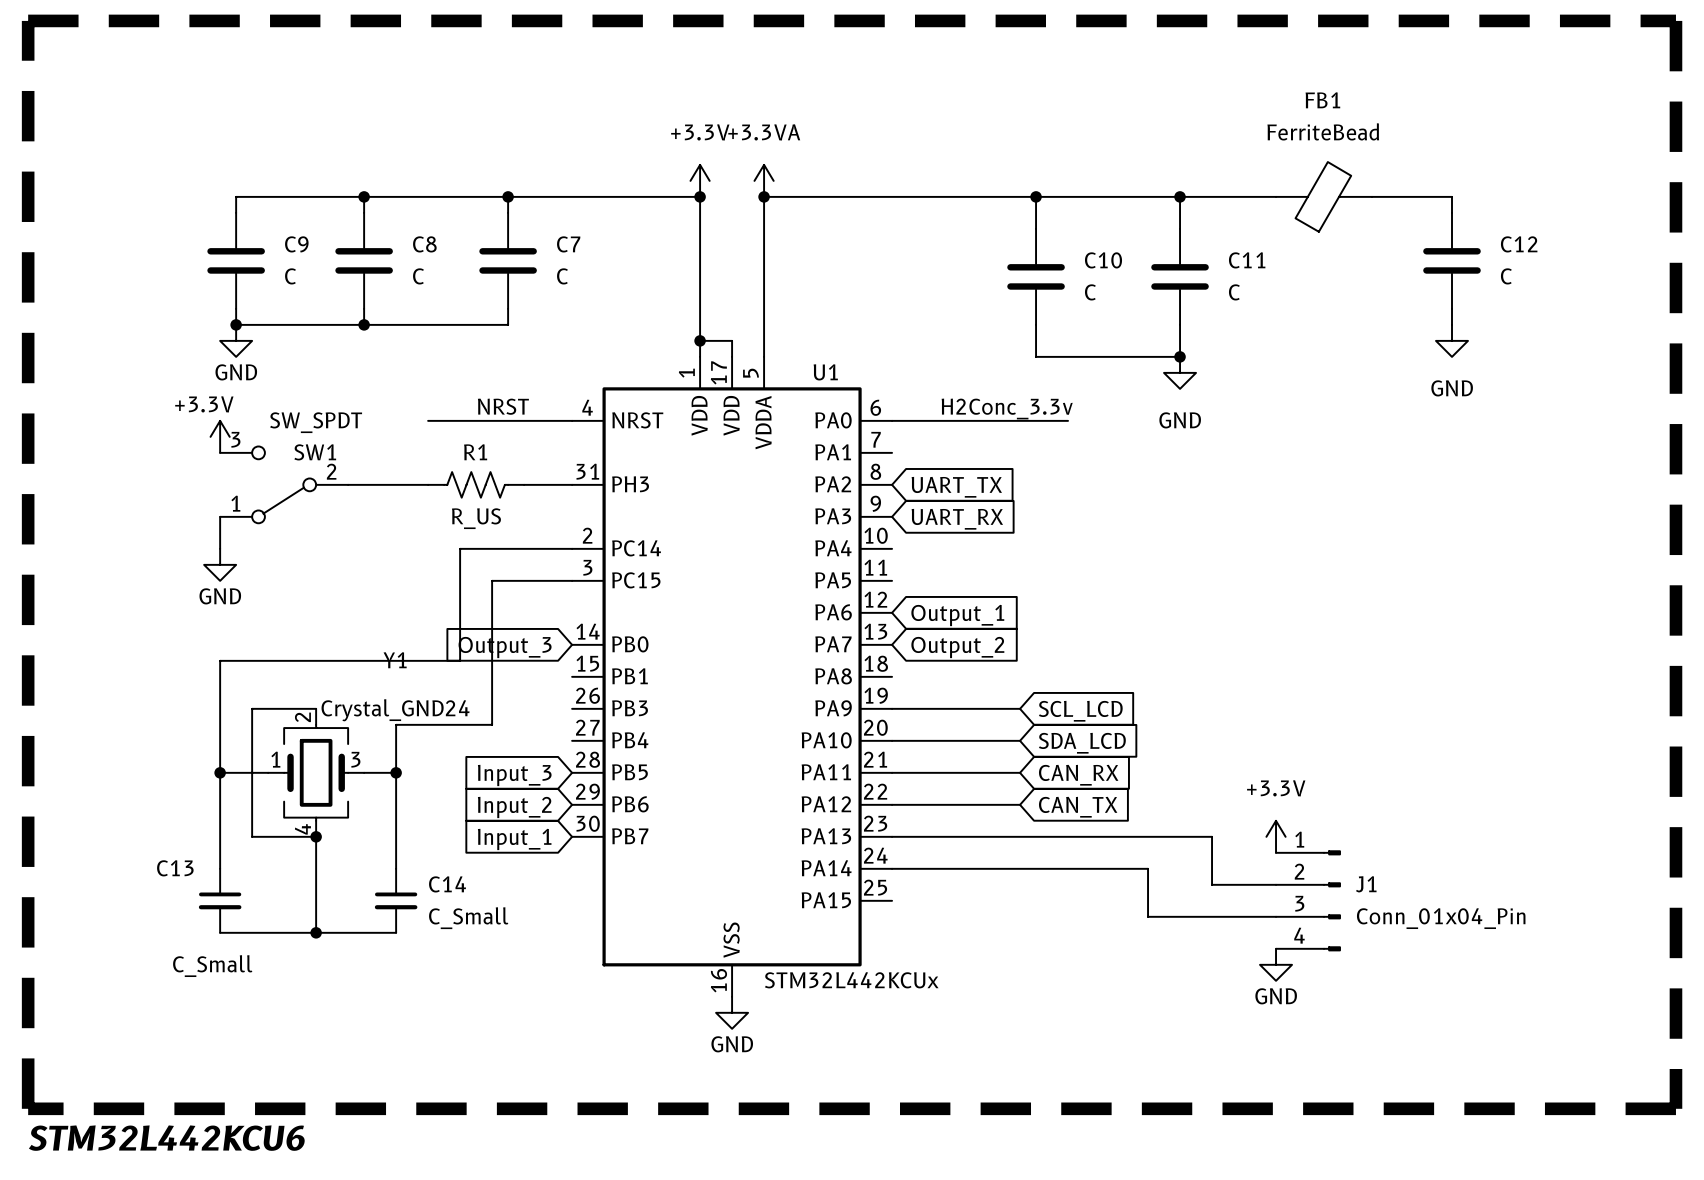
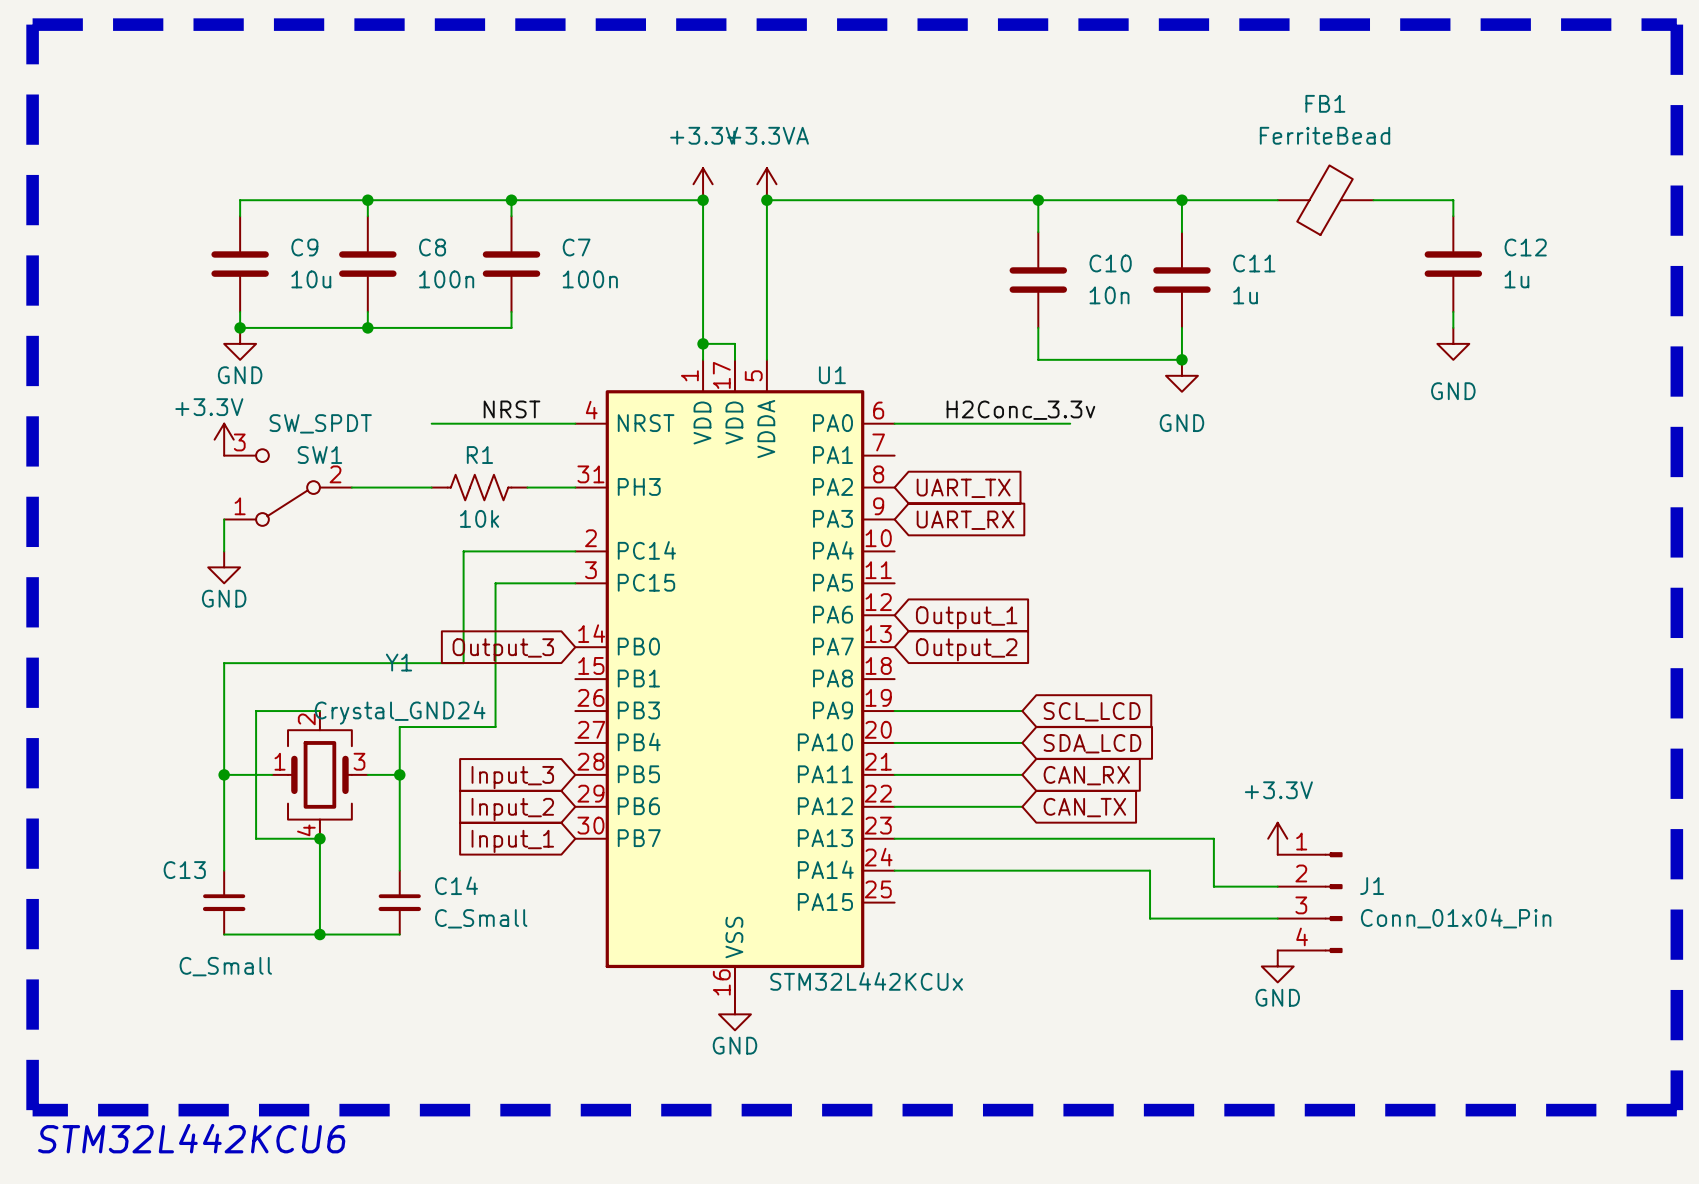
C9 value: C (290, 276) -> 10u (311, 279)
C8 value: C (418, 276) -> 100n (446, 279)
C7 value: C (562, 276) -> 100n (590, 279)
C12 value: C (1506, 276) -> 1u (1516, 279)
C10 value: C (1090, 292) -> 10n (1109, 295)
C11 value: C (1234, 292) -> 1u (1245, 295)
R1 value: R_US (476, 518) -> 10k (479, 518)

